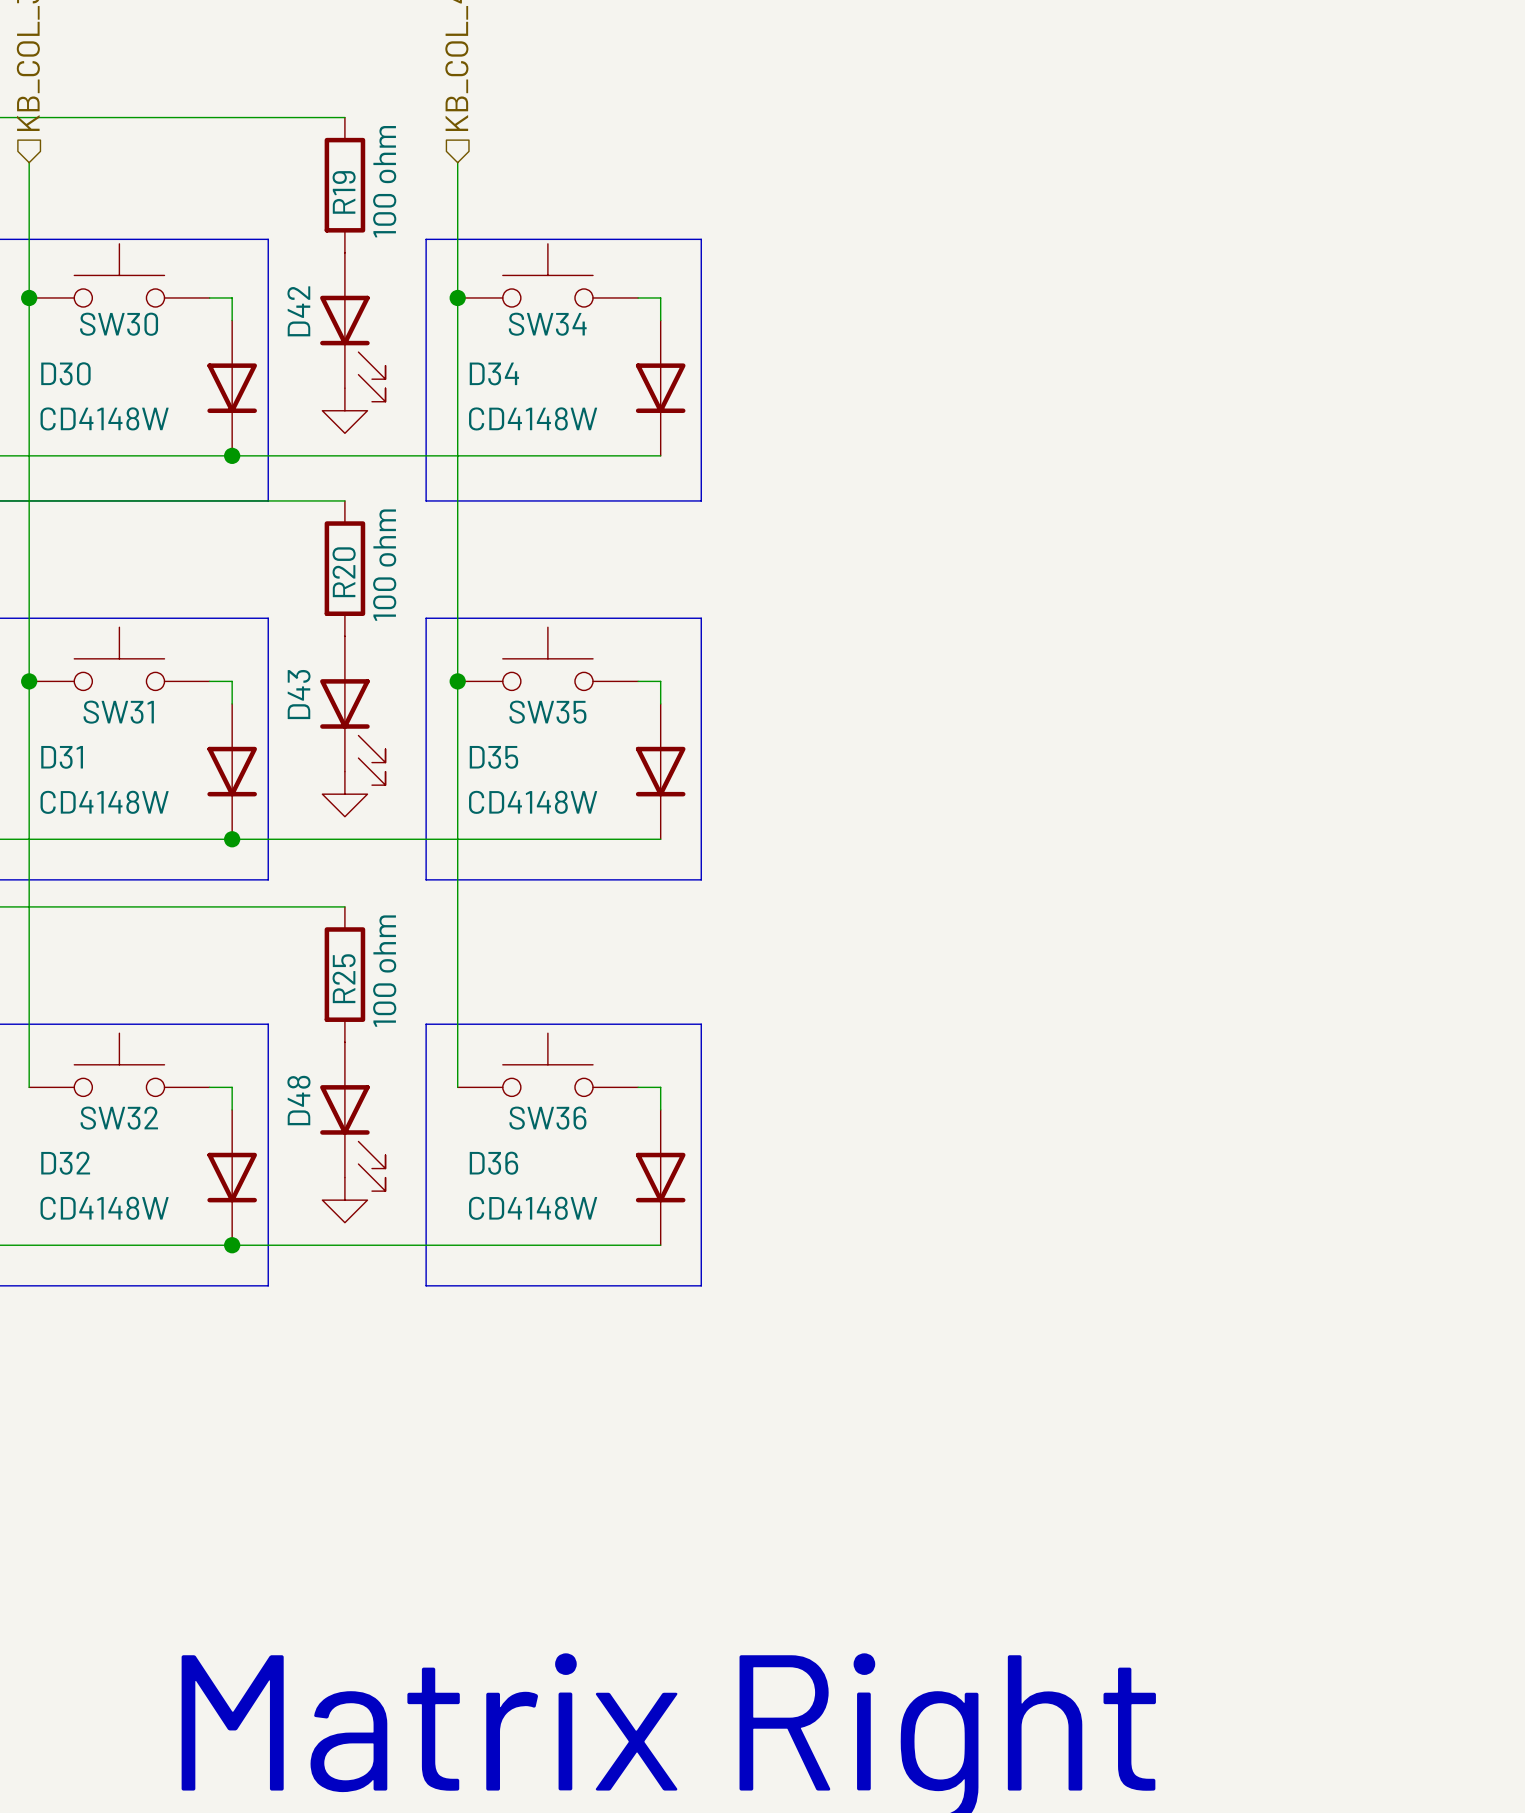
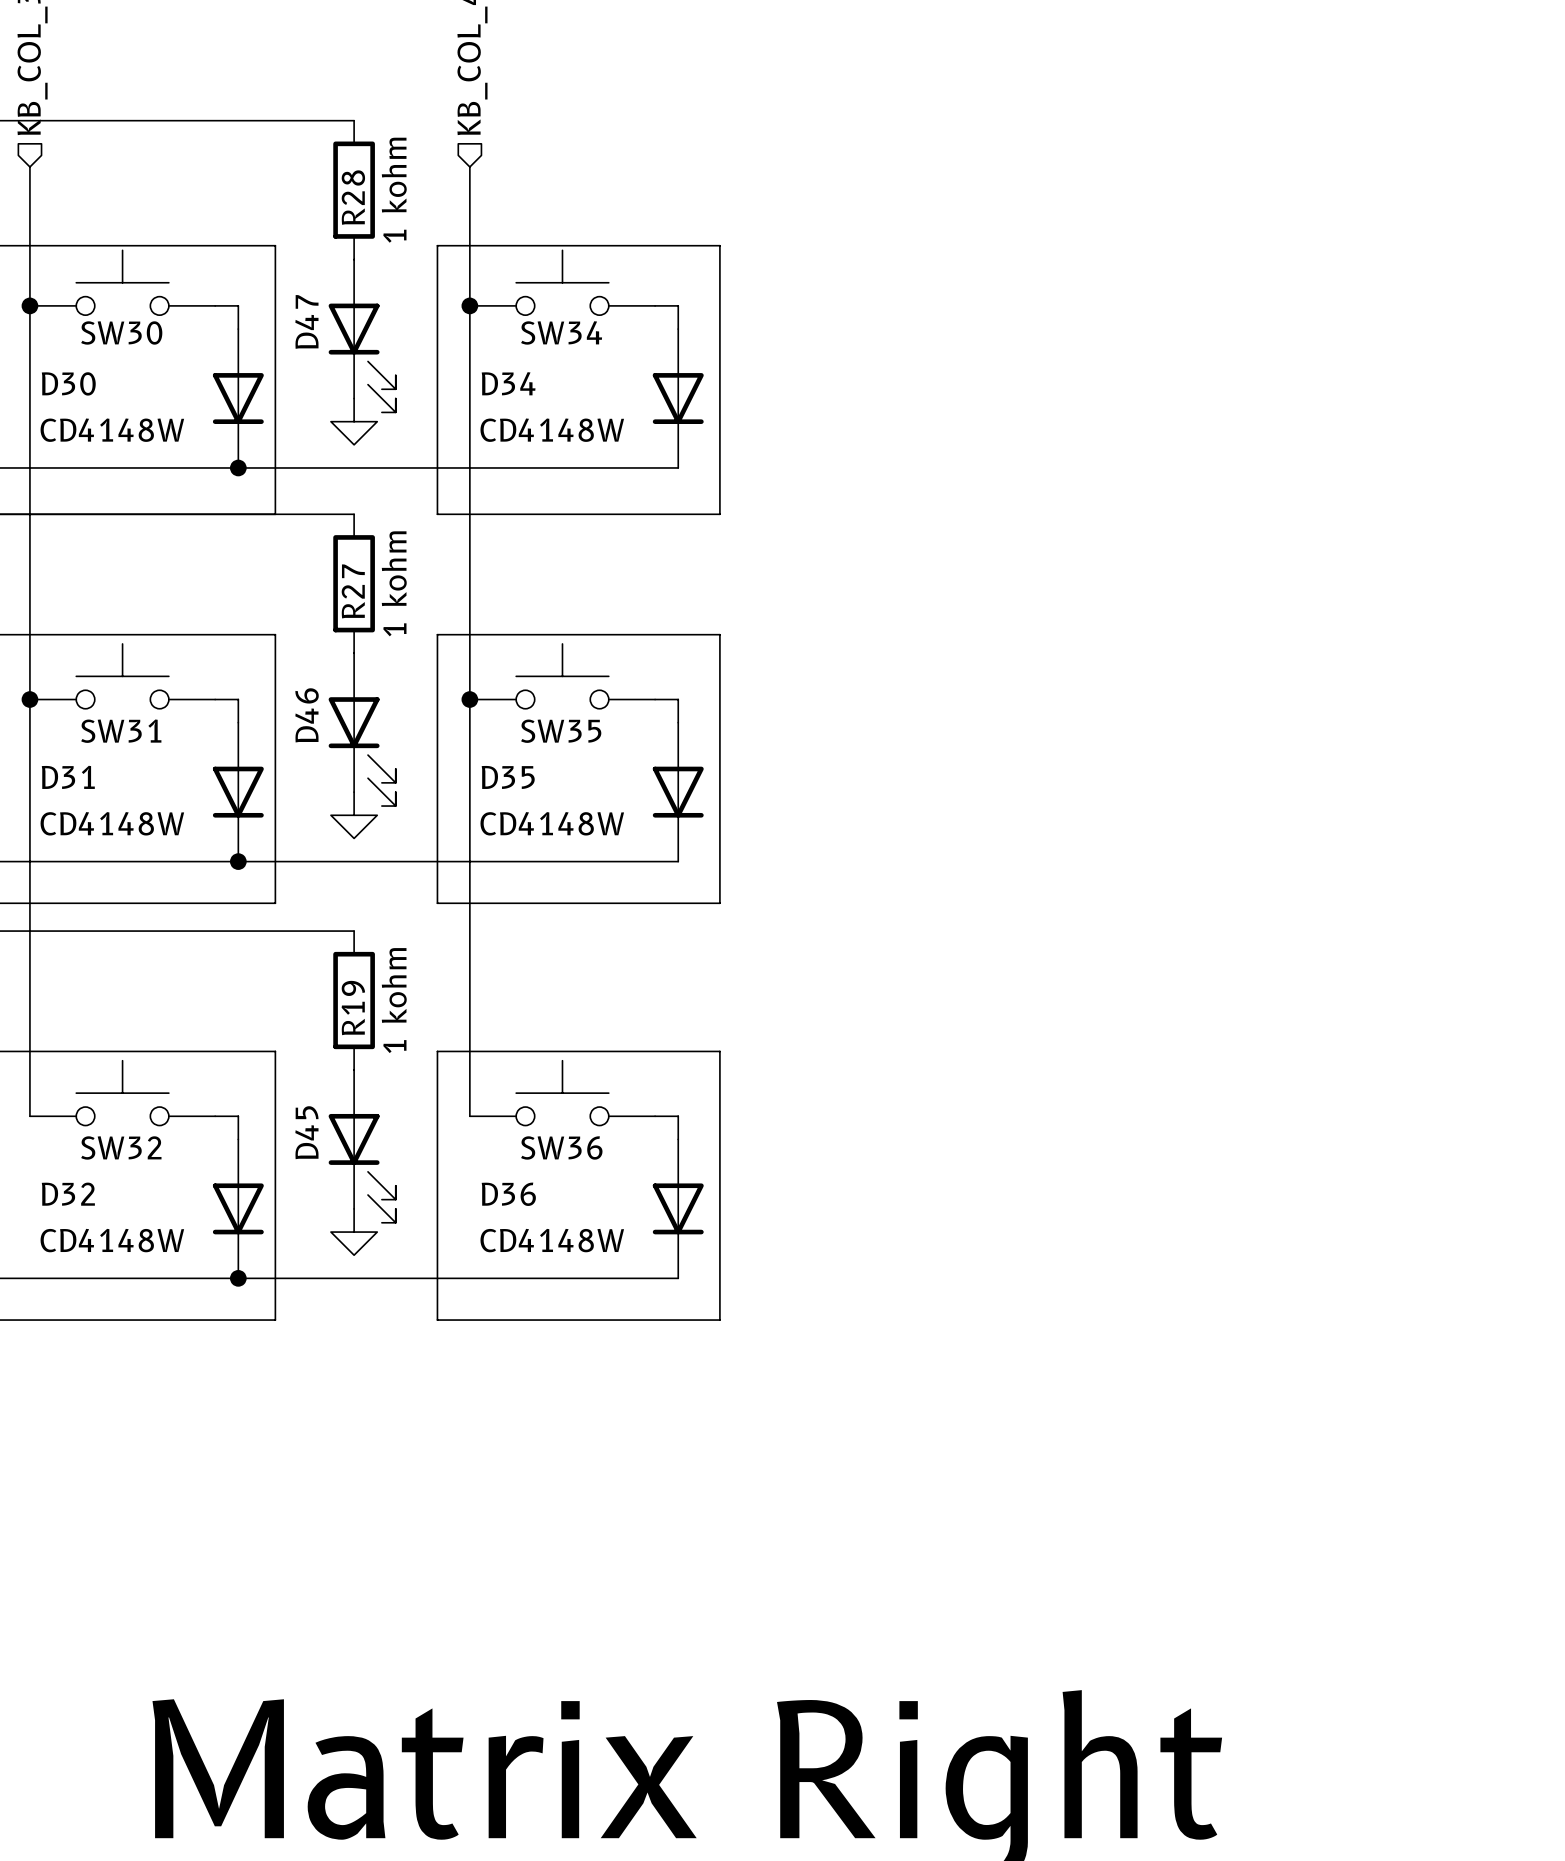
R19 value: 100 ohm (384, 181) -> 1 kohm (394, 190)
R19 name: R19 (344, 192) -> R28 (353, 197)
D42 name: D42 (298, 311) -> D47 (306, 321)
R20 value: 100 ohm (384, 565) -> 1 kohm (394, 583)
R20 name: R20 (344, 572) -> R27 (353, 591)
D43 name: D43 (299, 694) -> D46 (307, 715)
R25 value: 100 ohm (384, 971) -> 1 kohm (394, 1000)
R25 name: R25 (344, 978) -> R19 (353, 1008)
D48 name: D48 (298, 1100) -> D45 (306, 1132)

